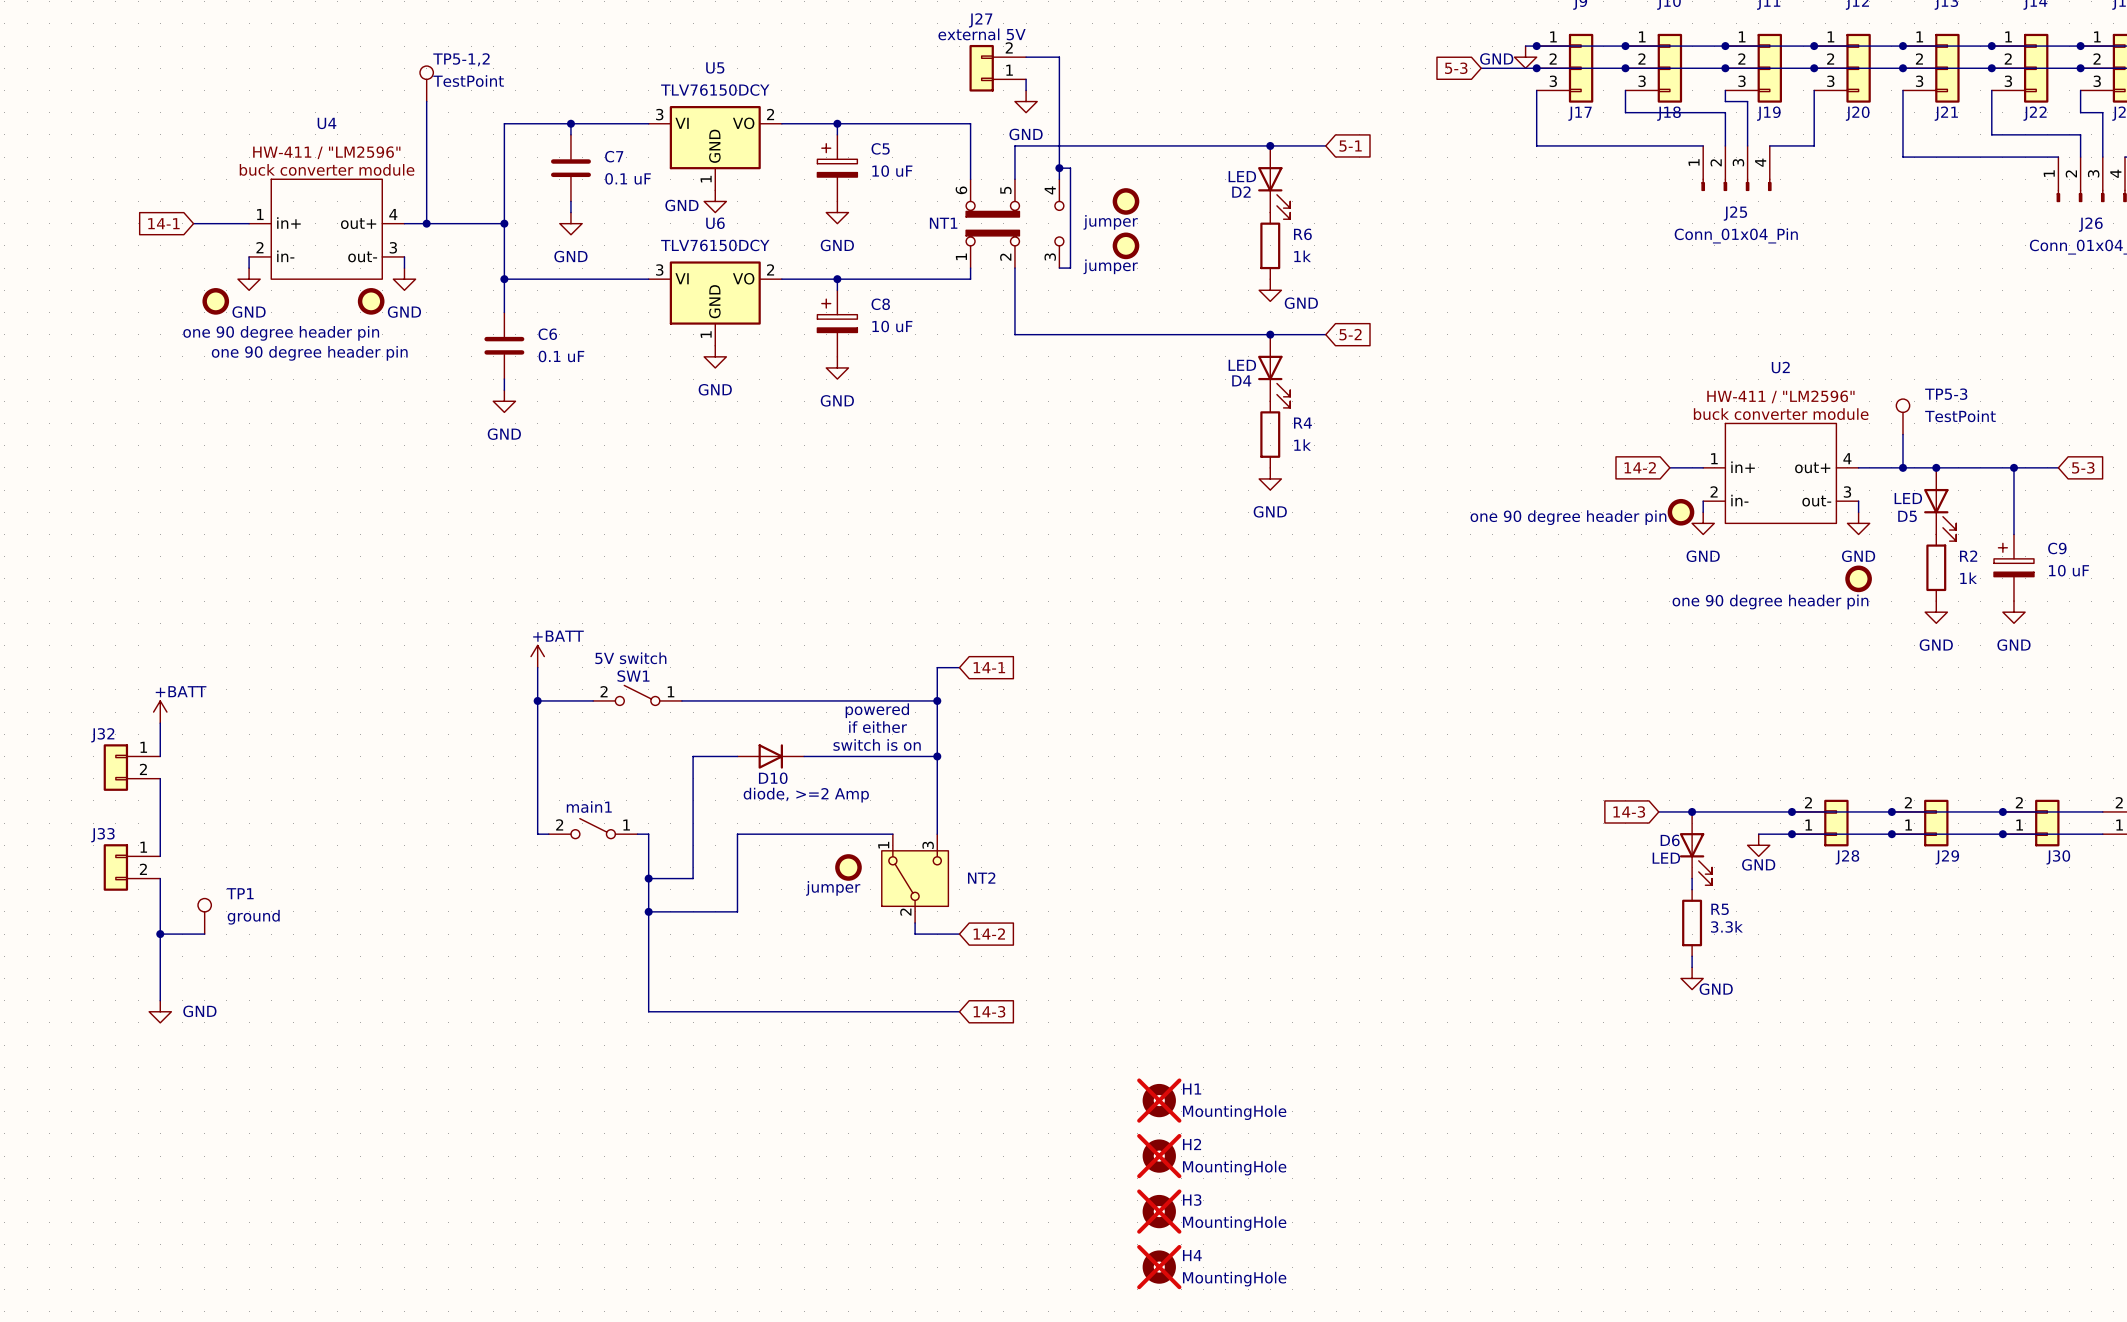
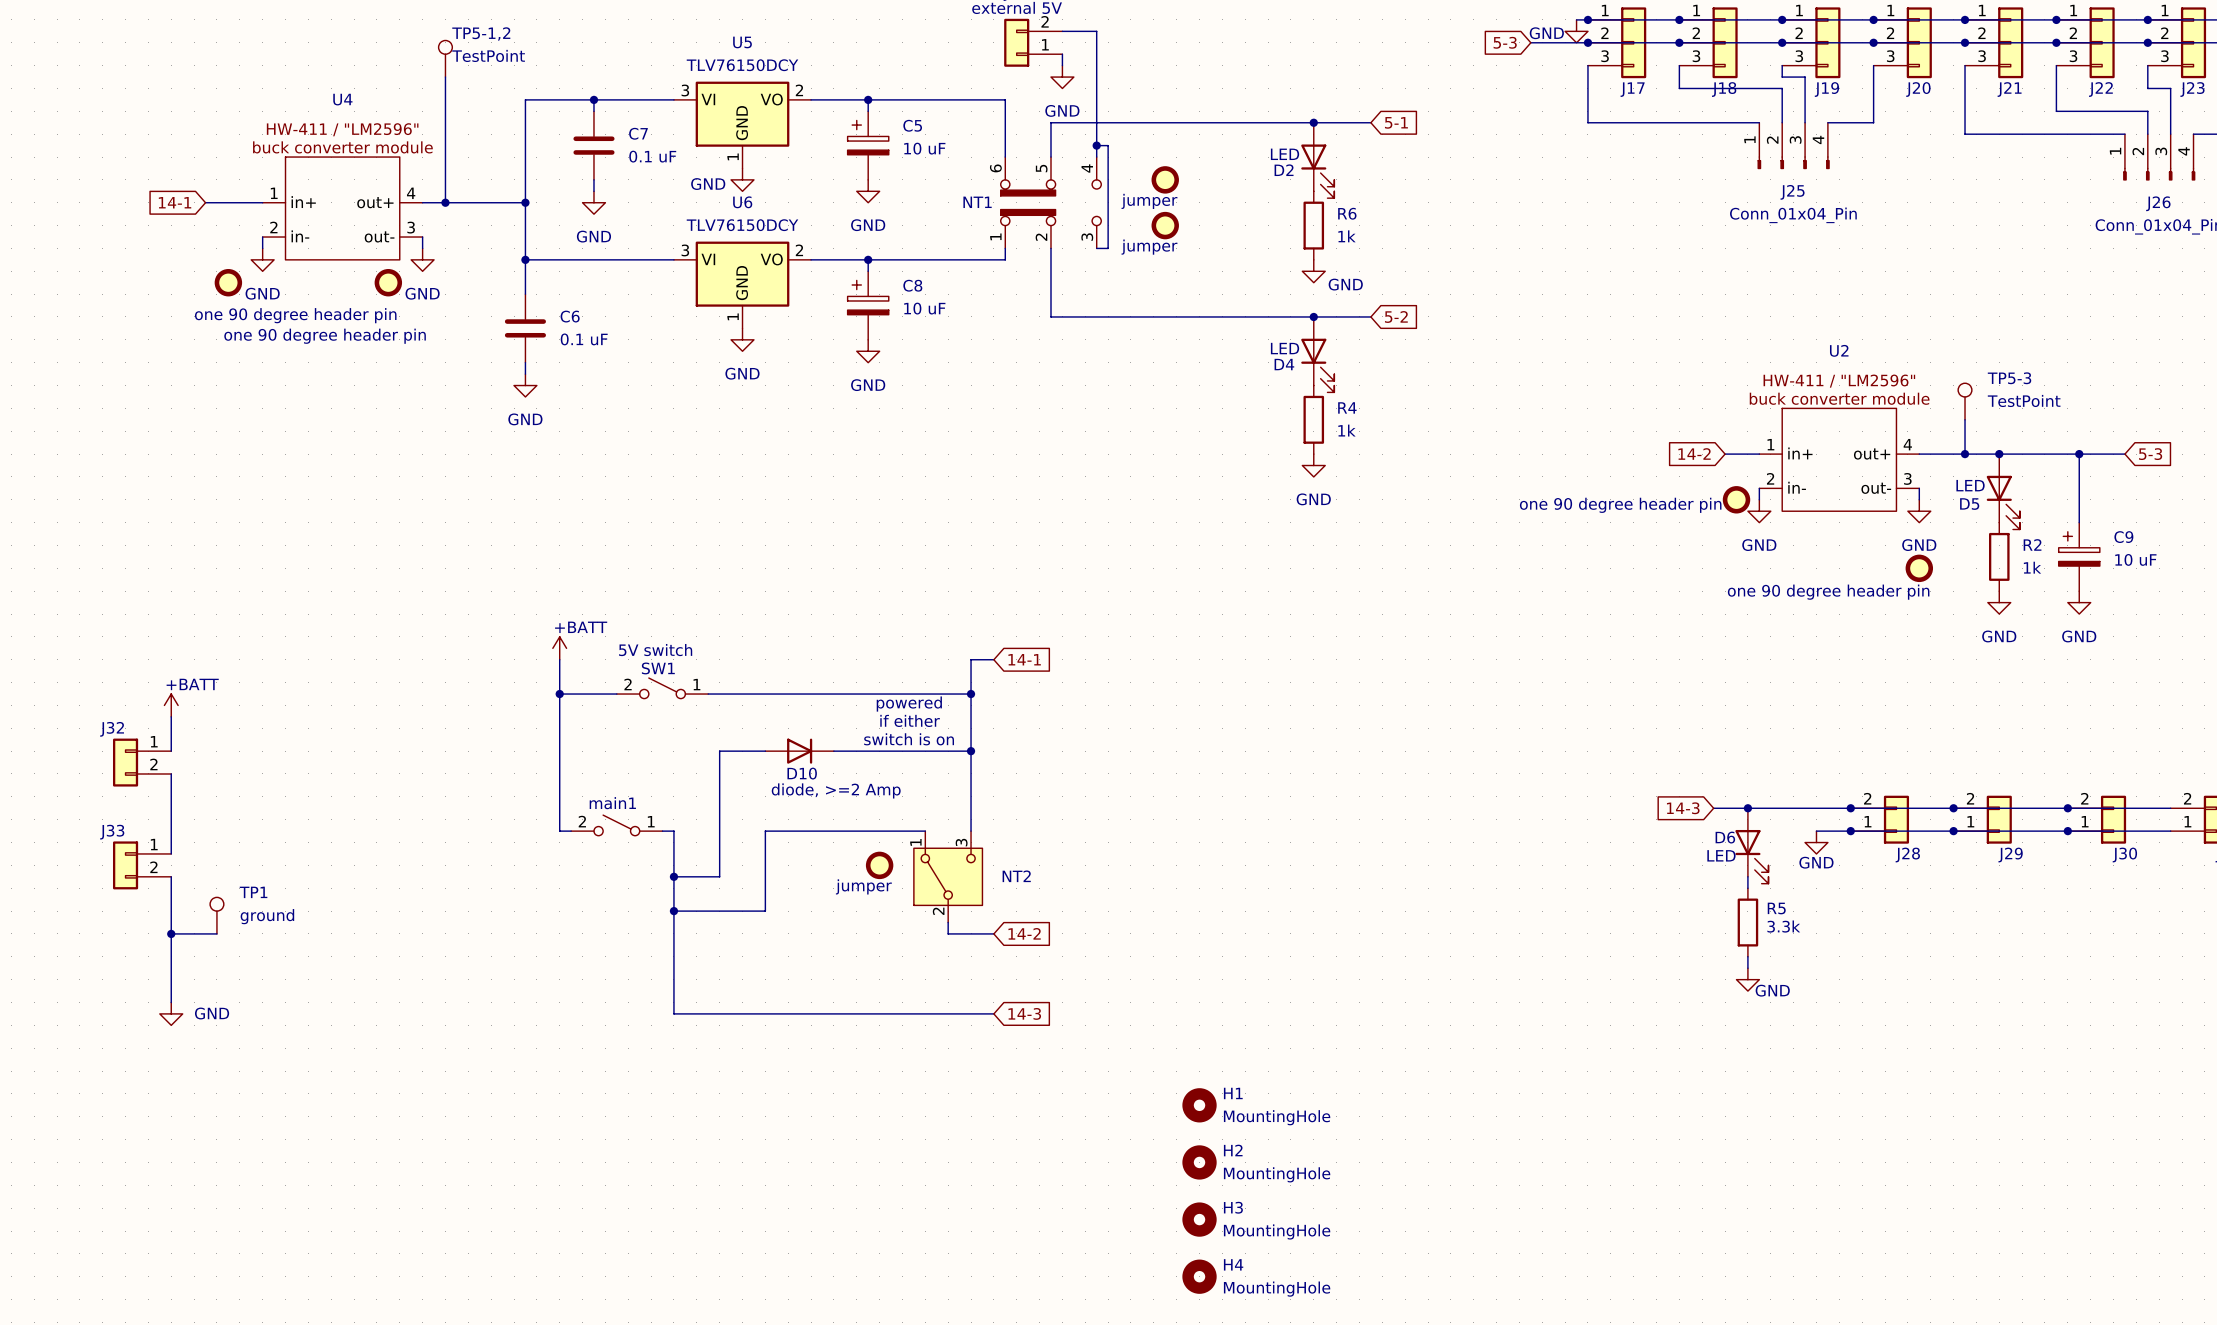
H1 do-not-place cross: (1159, 1100) -> none
H2 do-not-place cross: (1159, 1156) -> none
H3 do-not-place cross: (1159, 1211) -> none
H4 do-not-place cross: (1159, 1267) -> none

